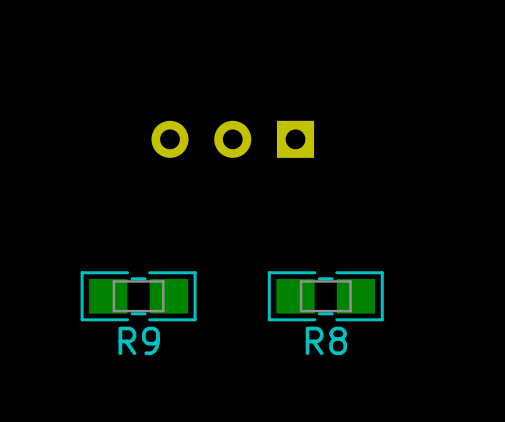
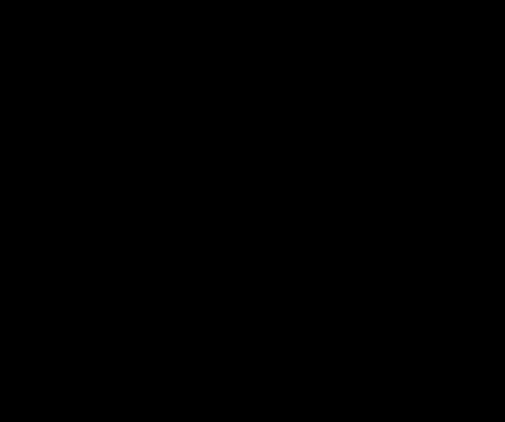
part: (232, 139) -> none
R9: (138, 296) -> none
R8: (325, 296) -> none

